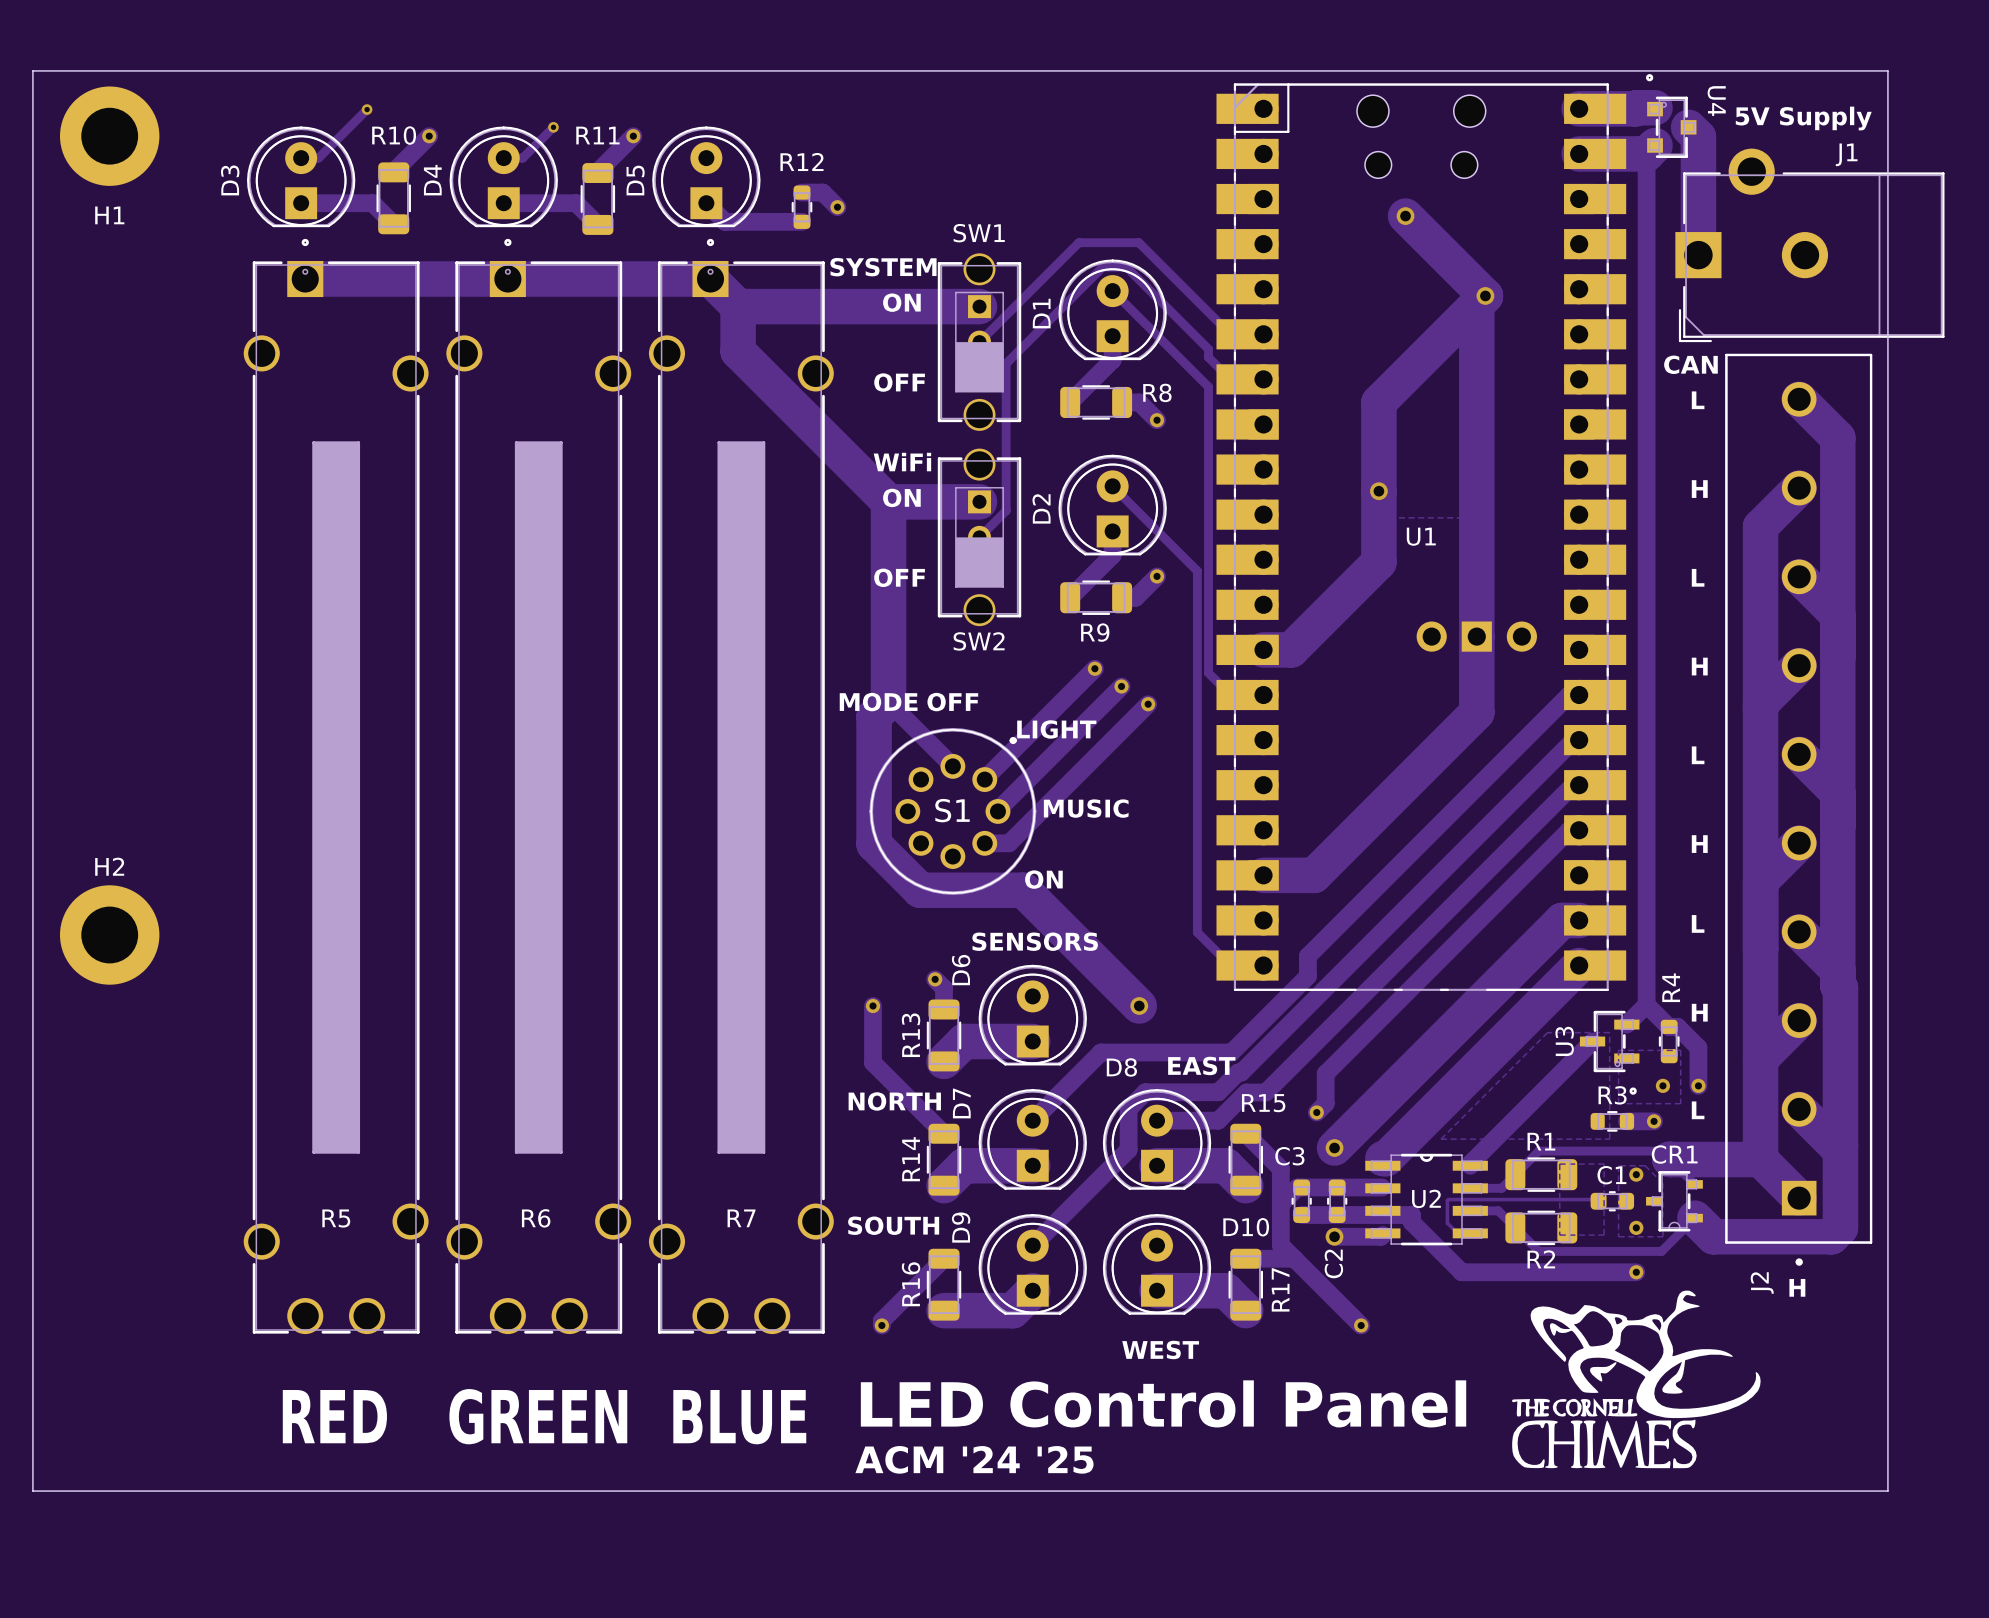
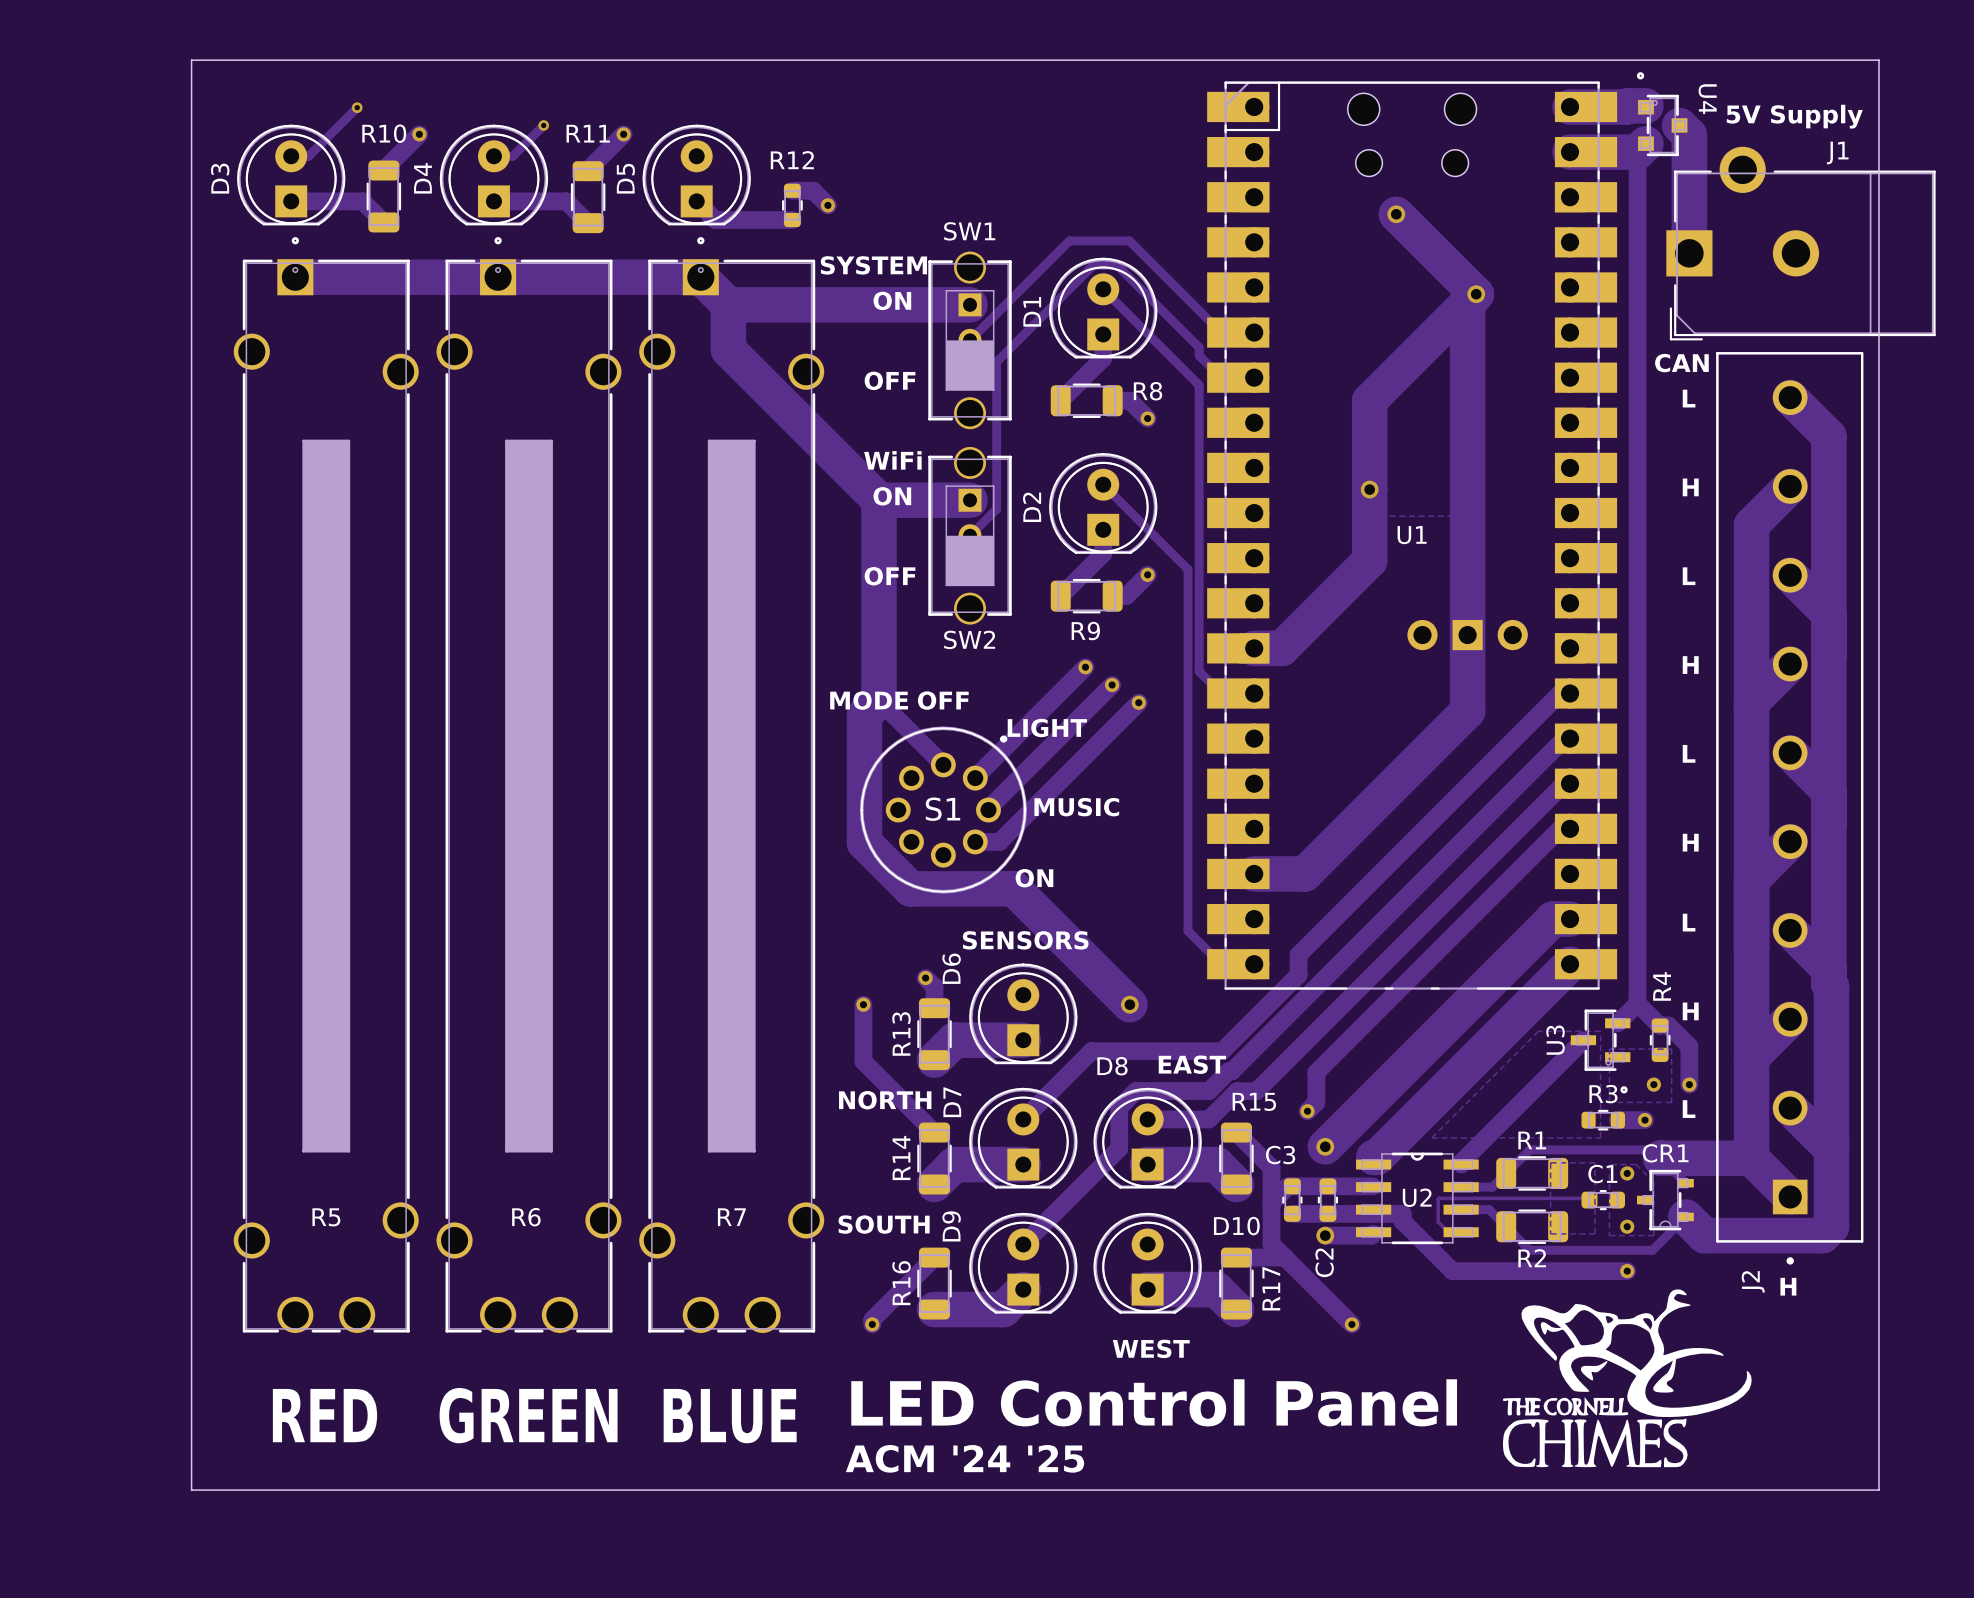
board edge: (1887, 70) (32, 70) (32, 1491) (201, 1491) -> (1879, 69) (1879, 60) (191, 60) (191, 1490)
H1: (109, 136) -> none
H2: (109, 934) -> none

